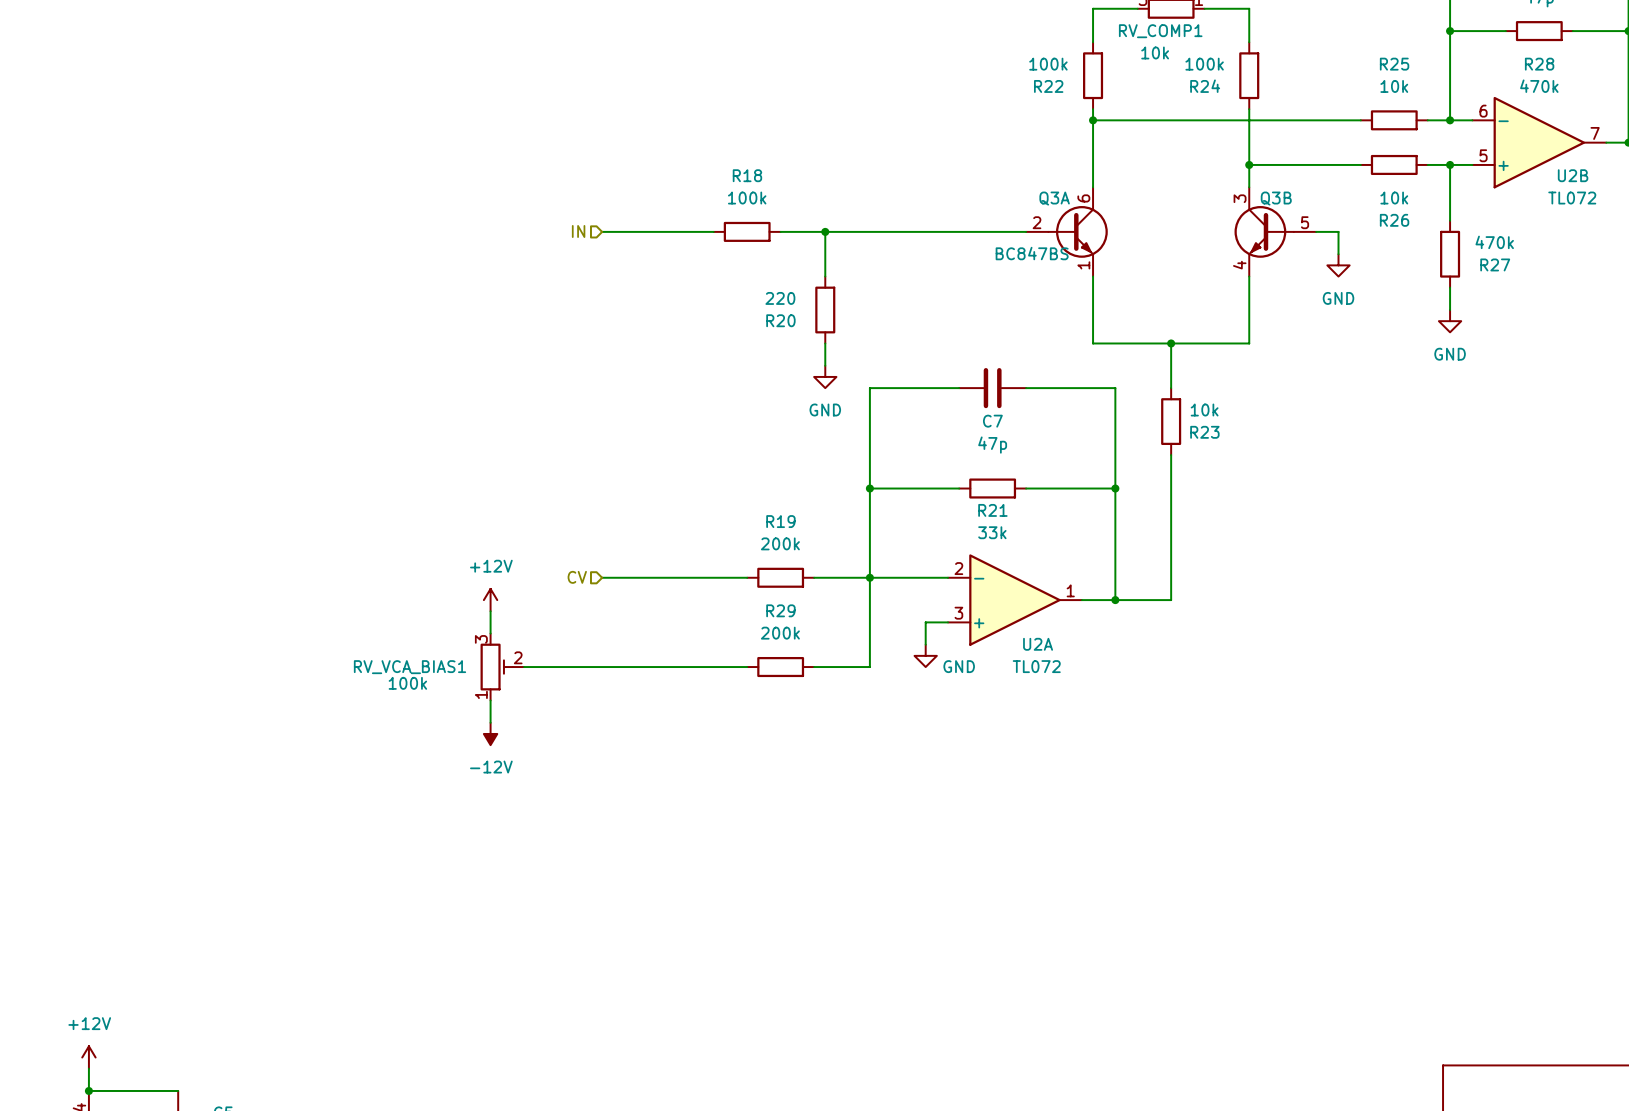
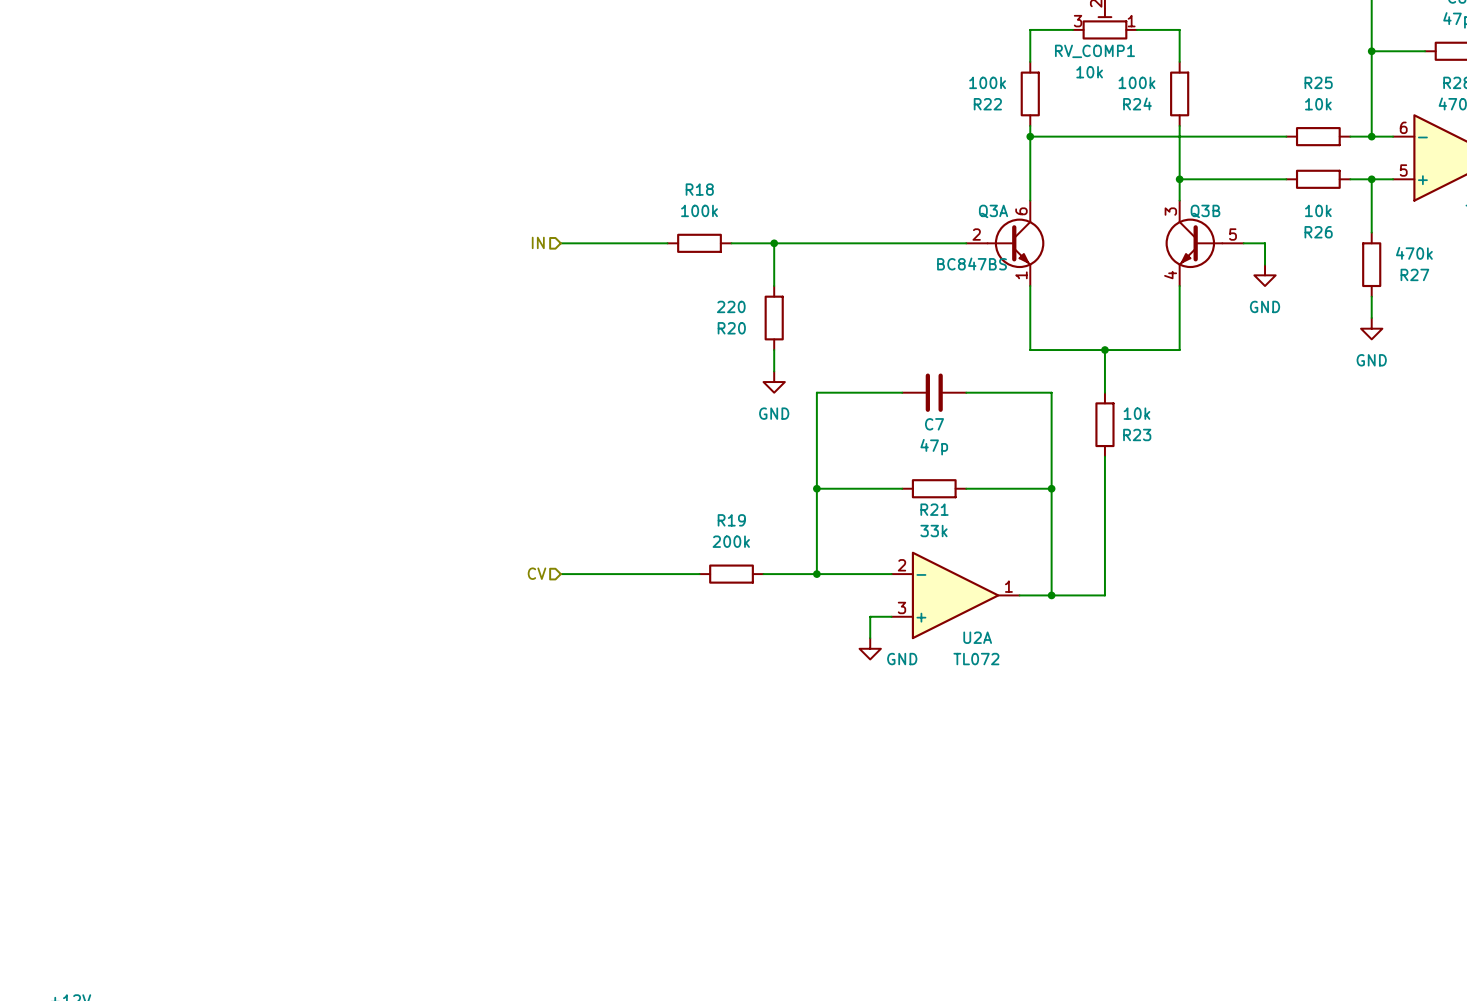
wire: (869, 577) (869, 667) (814, 667) -> none
power symbol: +12V (490, 600) -> none
wire: (490, 611) (490, 633) -> none
RV_VCA_BIAS1: 100k (502, 667) -> none
wire: (524, 667) (747, 667) -> none
R29: 200k (780, 667) -> none
wire: (490, 700) (490, 722) -> none
power symbol: -12V (490, 733) -> none

